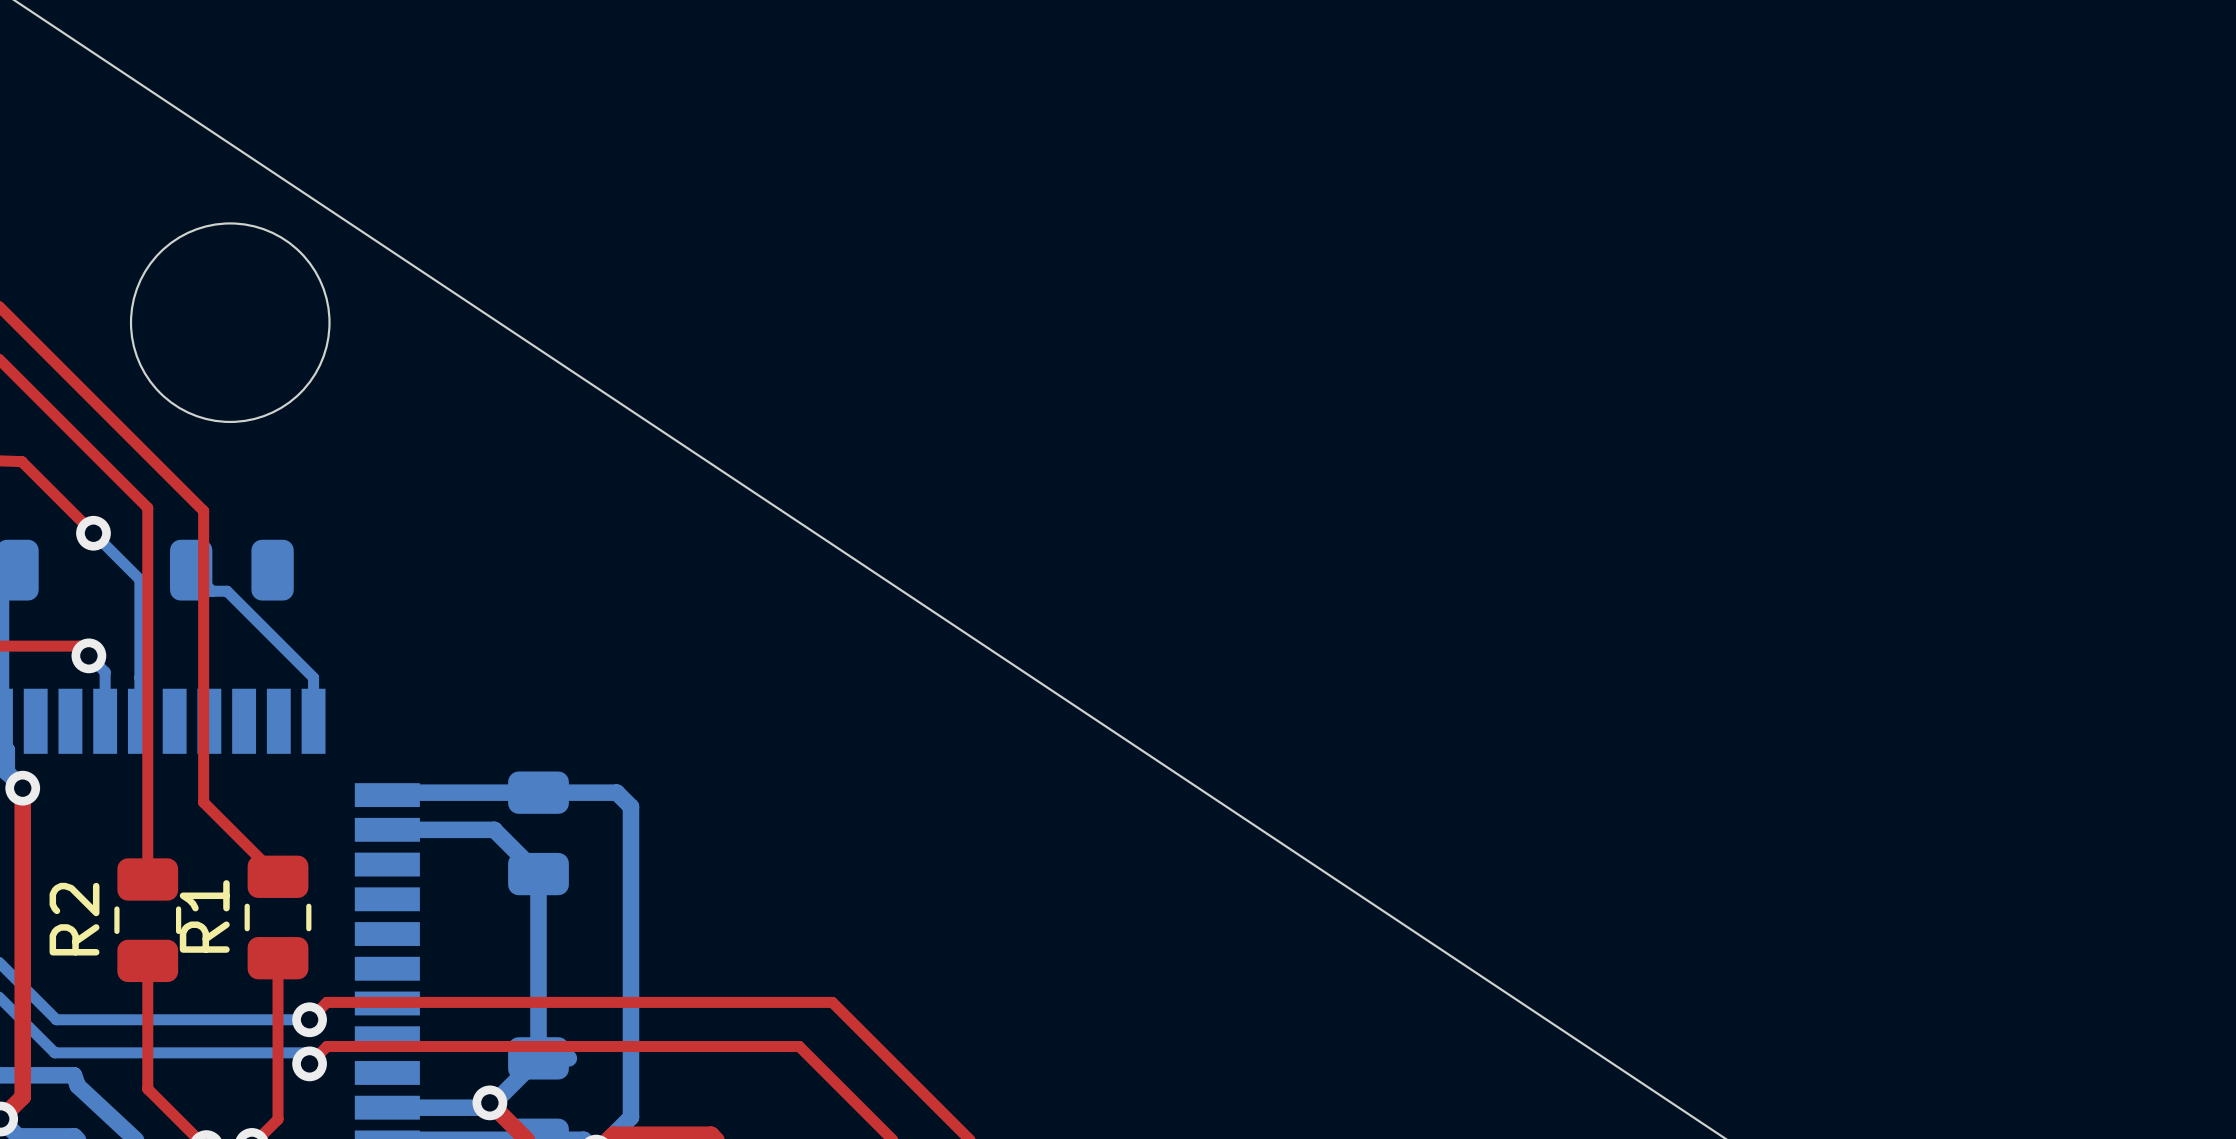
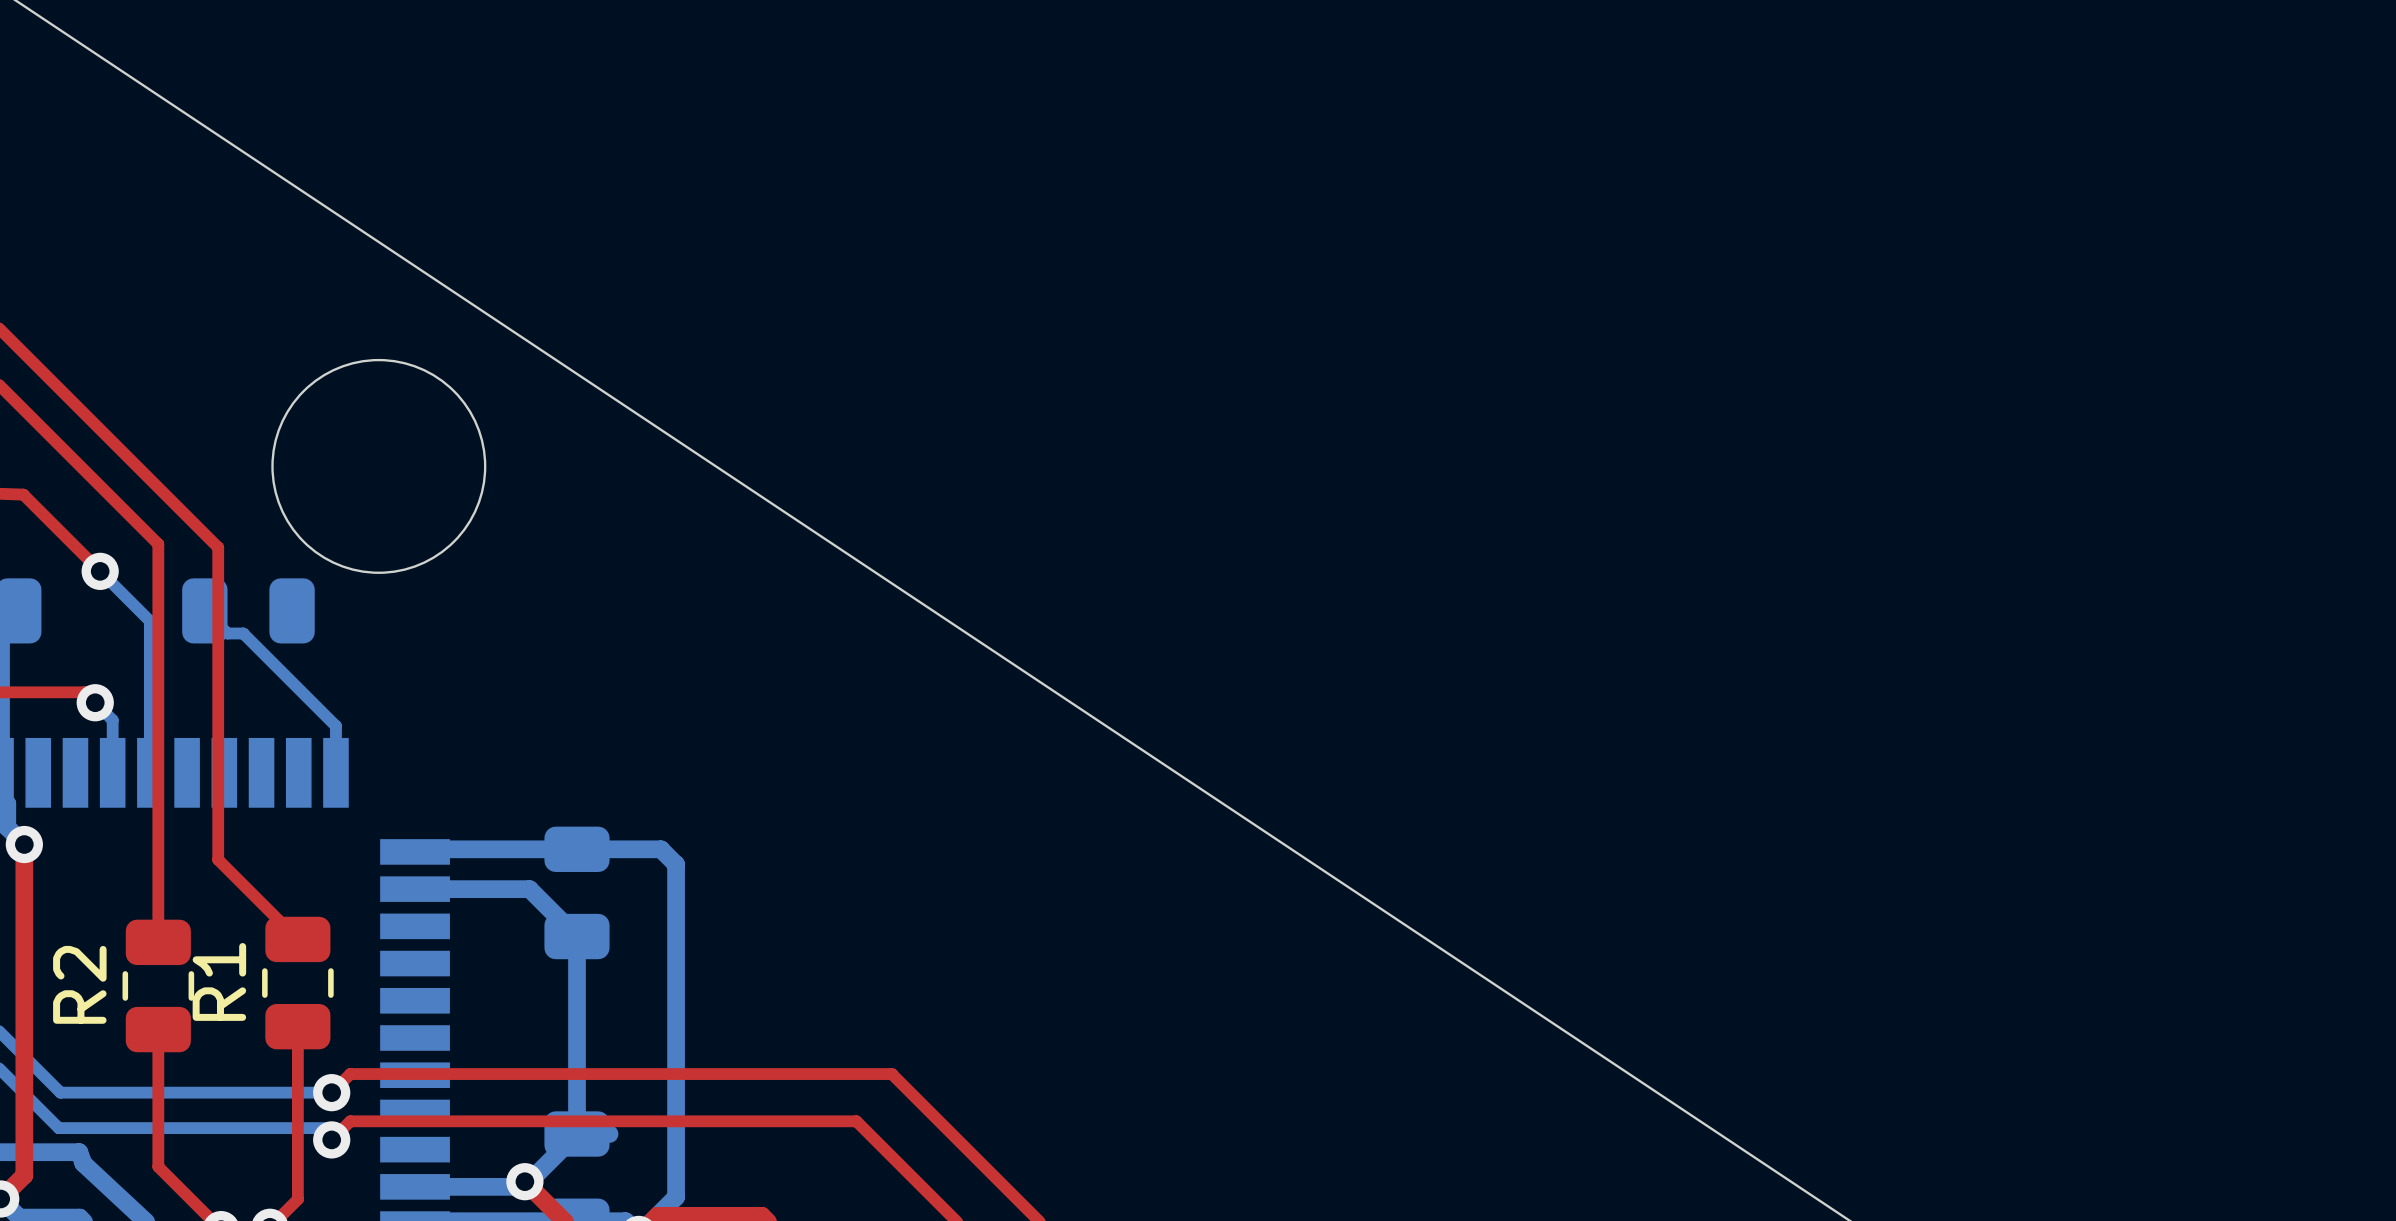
round board edge position: (230, 322) -> (378, 466)

